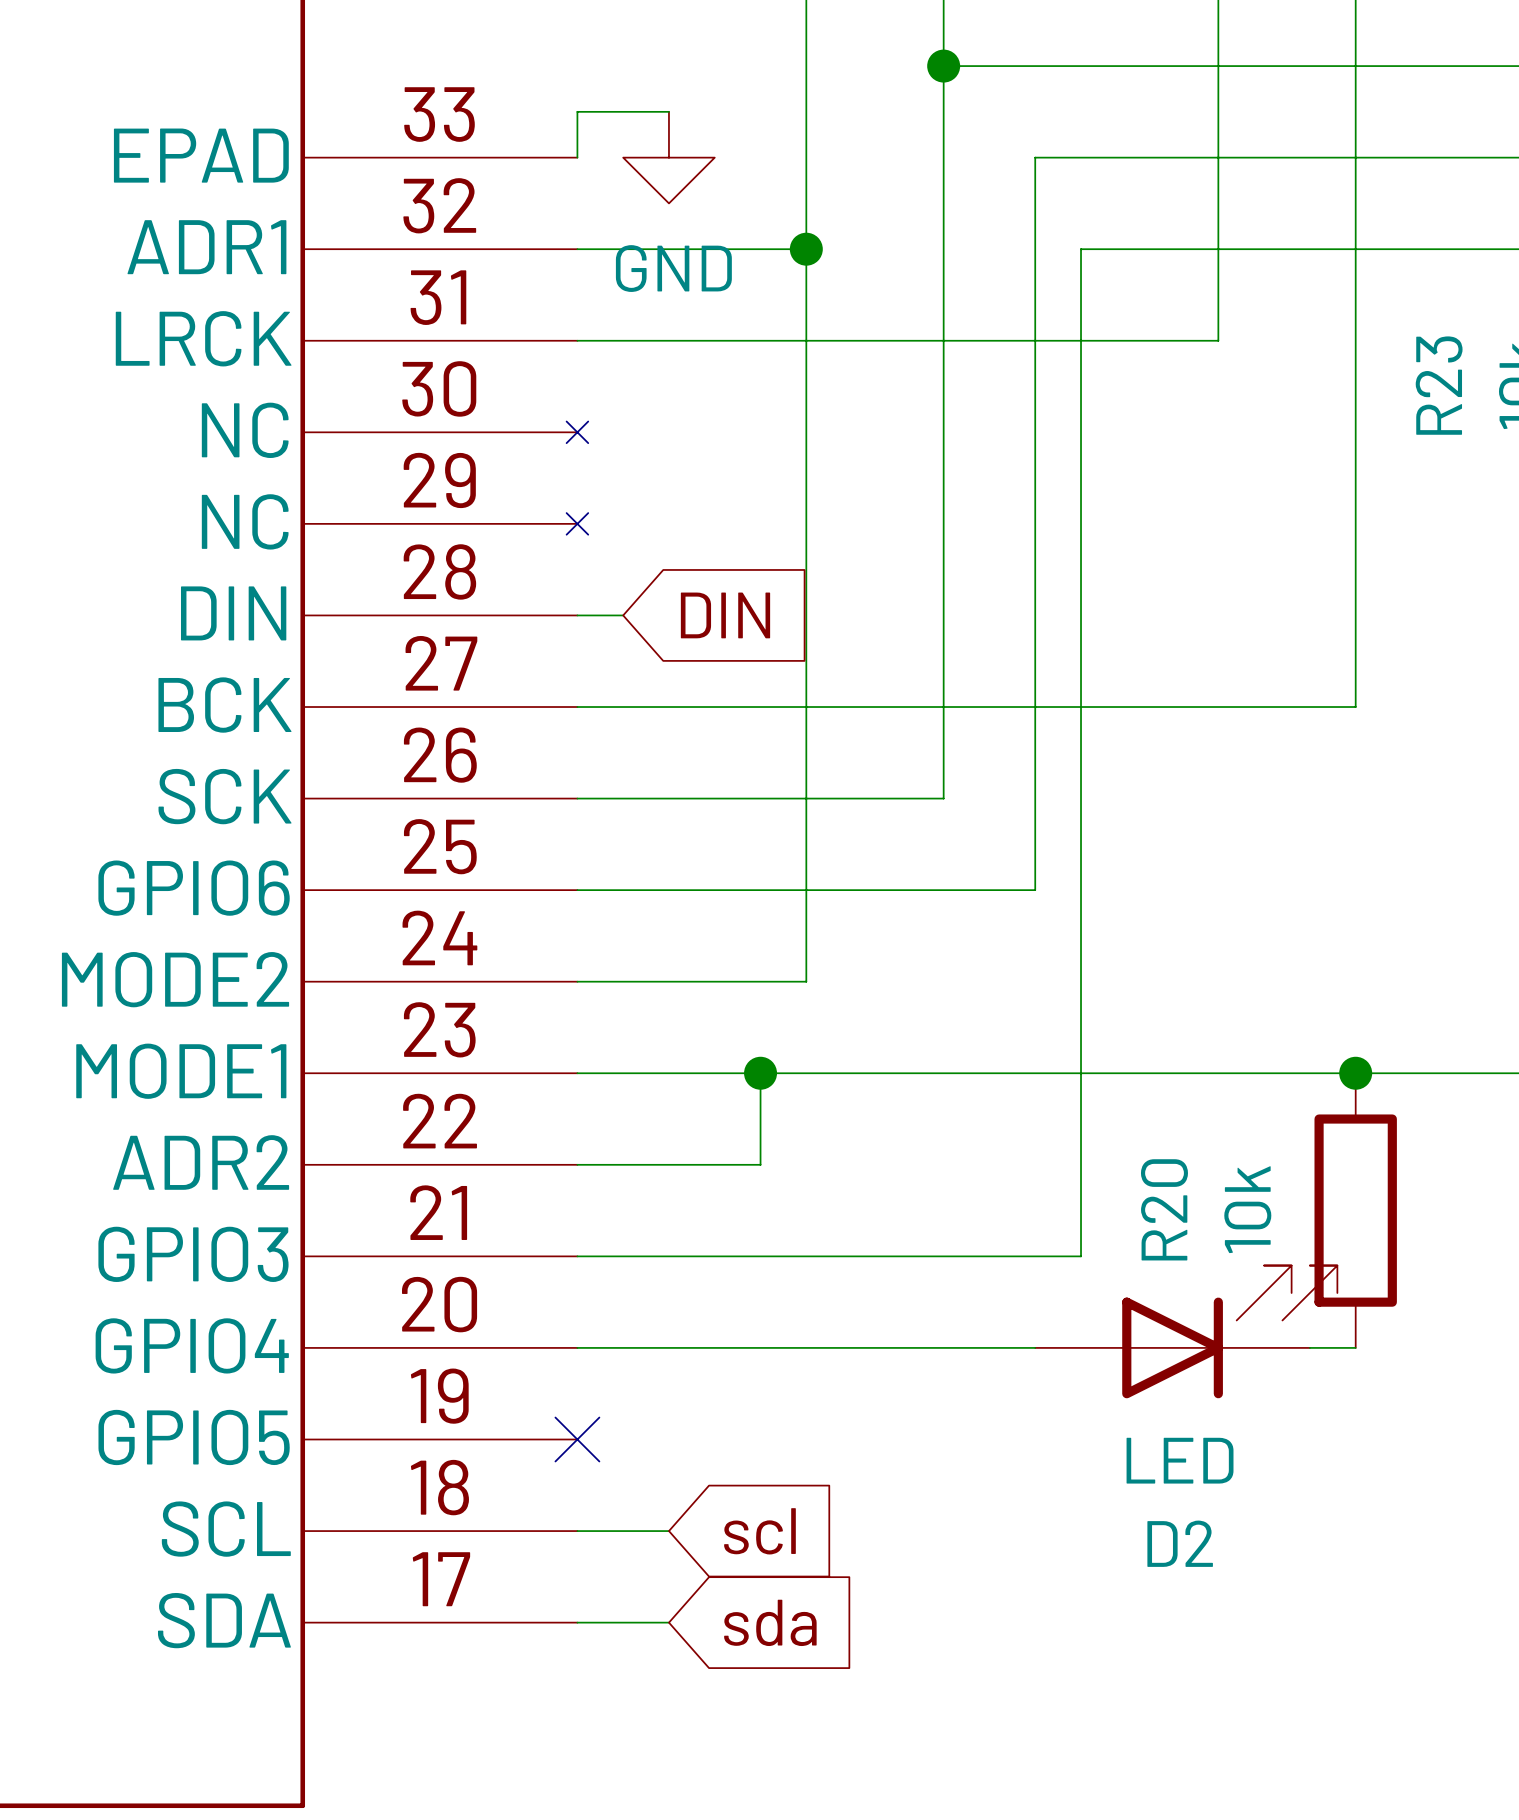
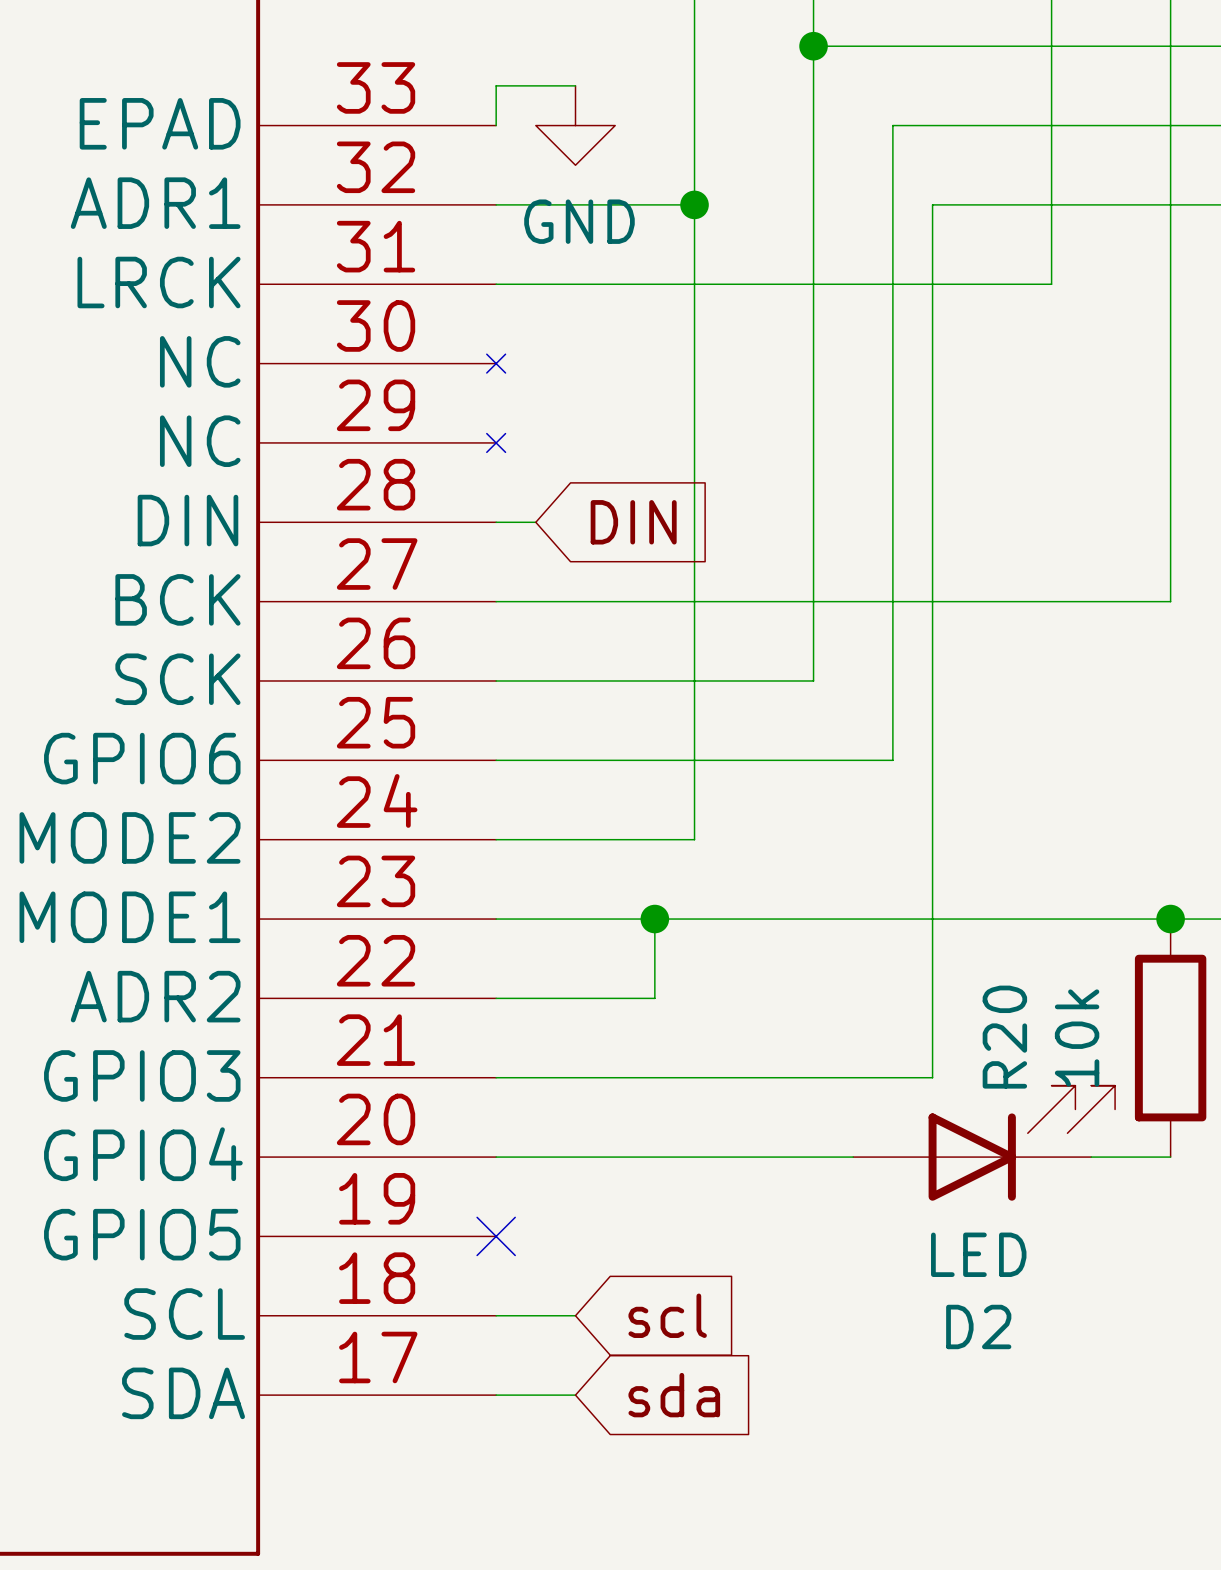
D2 position: (1186, 1331) -> (984, 1143)

